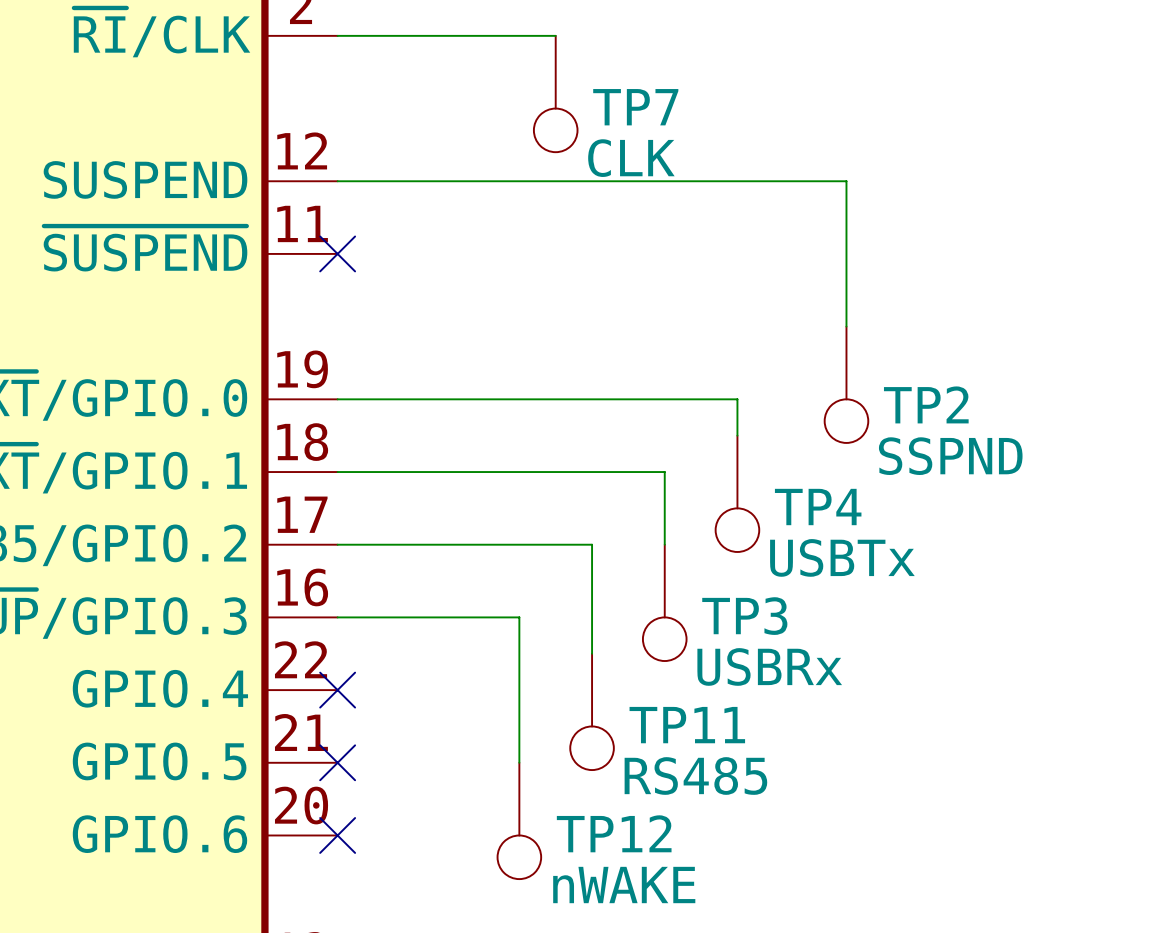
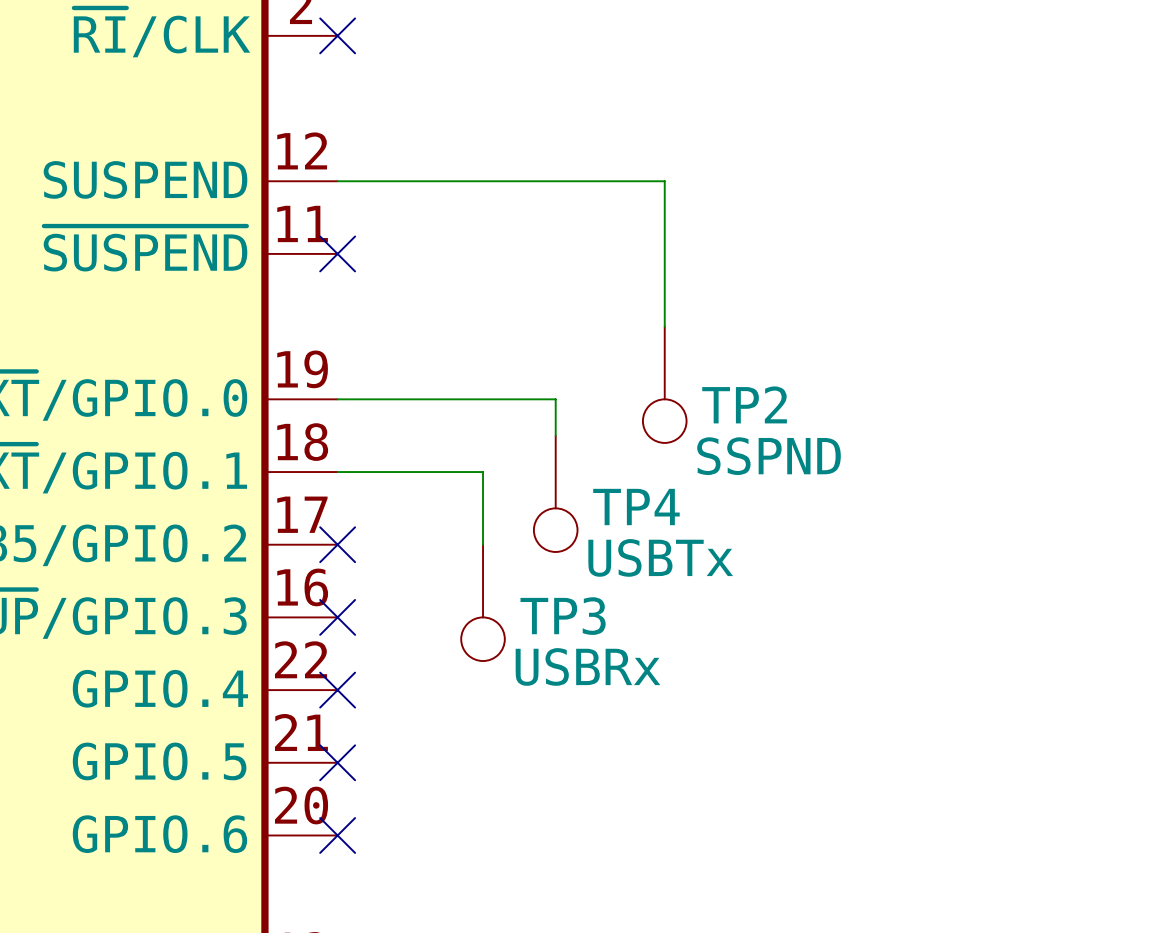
wire: (337, 35) (555, 35) -> none
no-connect mark: none -> (337, 35)
TP7: CLK (555, 94) -> none
wire: (664, 181) (846, 181) (846, 326) -> (664, 181) (664, 326)
TP2 position: (846, 384) -> (664, 384)
wire: (555, 399) (737, 399) (737, 435) -> (555, 399) (555, 435)
wire: (483, 472) (664, 472) (664, 544) -> (483, 472) (483, 544)
TP4 position: (737, 493) -> (555, 493)
wire: (337, 544) (592, 544) (592, 653) -> none
no-connect mark: none -> (337, 544)
TP3 position: (664, 602) -> (483, 602)
wire: (337, 617) (519, 617) (519, 762) -> none
no-connect mark: none -> (337, 617)
TP11: RS485 (592, 711) -> none
TP12: nWAKE (519, 820) -> none

